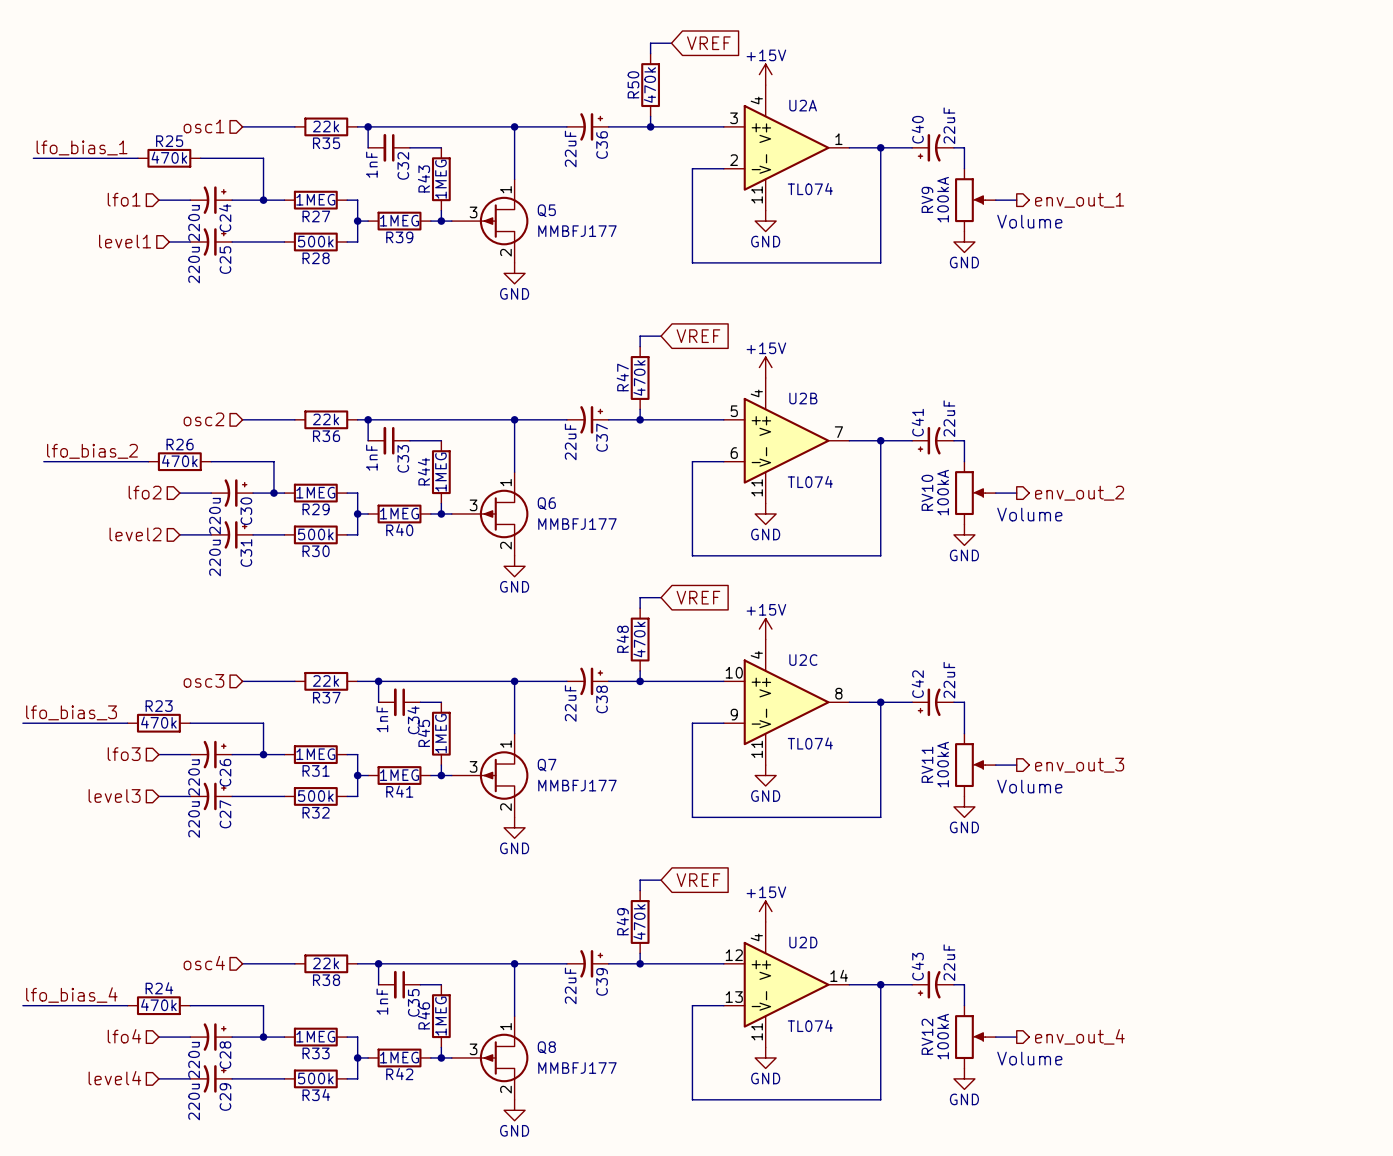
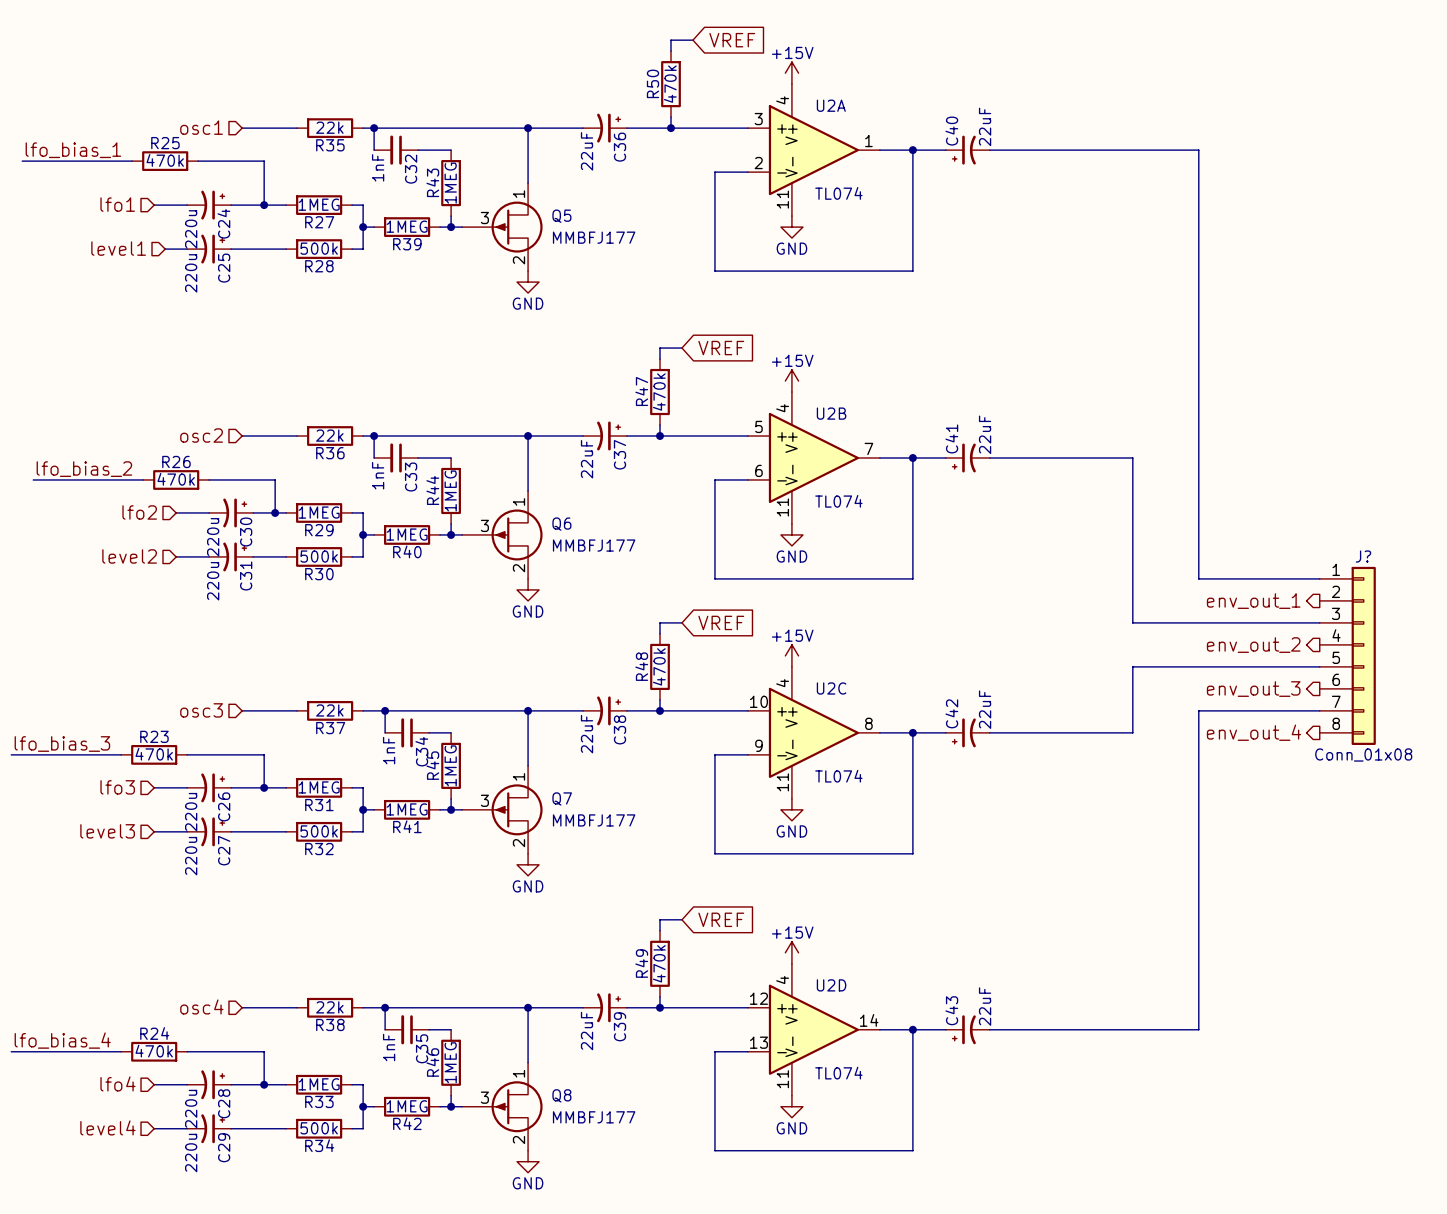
wire: (964, 147) (964, 168) -> (1000, 150) (1198, 150) (1198, 578) (1319, 578)
RV9: 100kA (975, 200) -> none
wire: (995, 200) (1016, 200) -> none
hierarchical label: env_out_1 (1079, 200) -> none
text: Volume (1029, 221) -> none
power symbol: GND (964, 241) -> none
wire: (964, 440) (964, 461) -> (1000, 457) (1132, 457) (1132, 622) (1319, 622)
RV10: 100kA (975, 493) -> none
wire: (995, 493) (1016, 493) -> none
hierarchical label: env_out_2 (1079, 493) -> none
text: Volume (1029, 514) -> none
power symbol: GND (964, 534) -> none
hierarchical label: none -> env_out_1 (1253, 601)
hierarchical label: none -> env_out_2 (1253, 645)
J?: none -> Conn_01x08 (1347, 655)
hierarchical label: none -> env_out_3 (1253, 689)
wire: (964, 702) (964, 733) -> (1000, 732) (1132, 732) (1132, 666) (1319, 666)
hierarchical label: none -> env_out_4 (1254, 732)
RV11: 100kA (975, 765) -> none
wire: (995, 765) (1016, 765) -> none
hierarchical label: env_out_3 (1079, 765) -> none
text: Volume (1029, 786) -> none
power symbol: GND (964, 806) -> none
wire: (964, 984) (964, 1005) -> (1000, 1029) (1198, 1029) (1198, 710) (1319, 710)
hierarchical label: env_out_4 (1079, 1036) -> none
RV12: 100kA (975, 1037) -> none
wire: (995, 1037) (1016, 1037) -> none
text: Volume (1029, 1058) -> none
power symbol: GND (964, 1078) -> none

